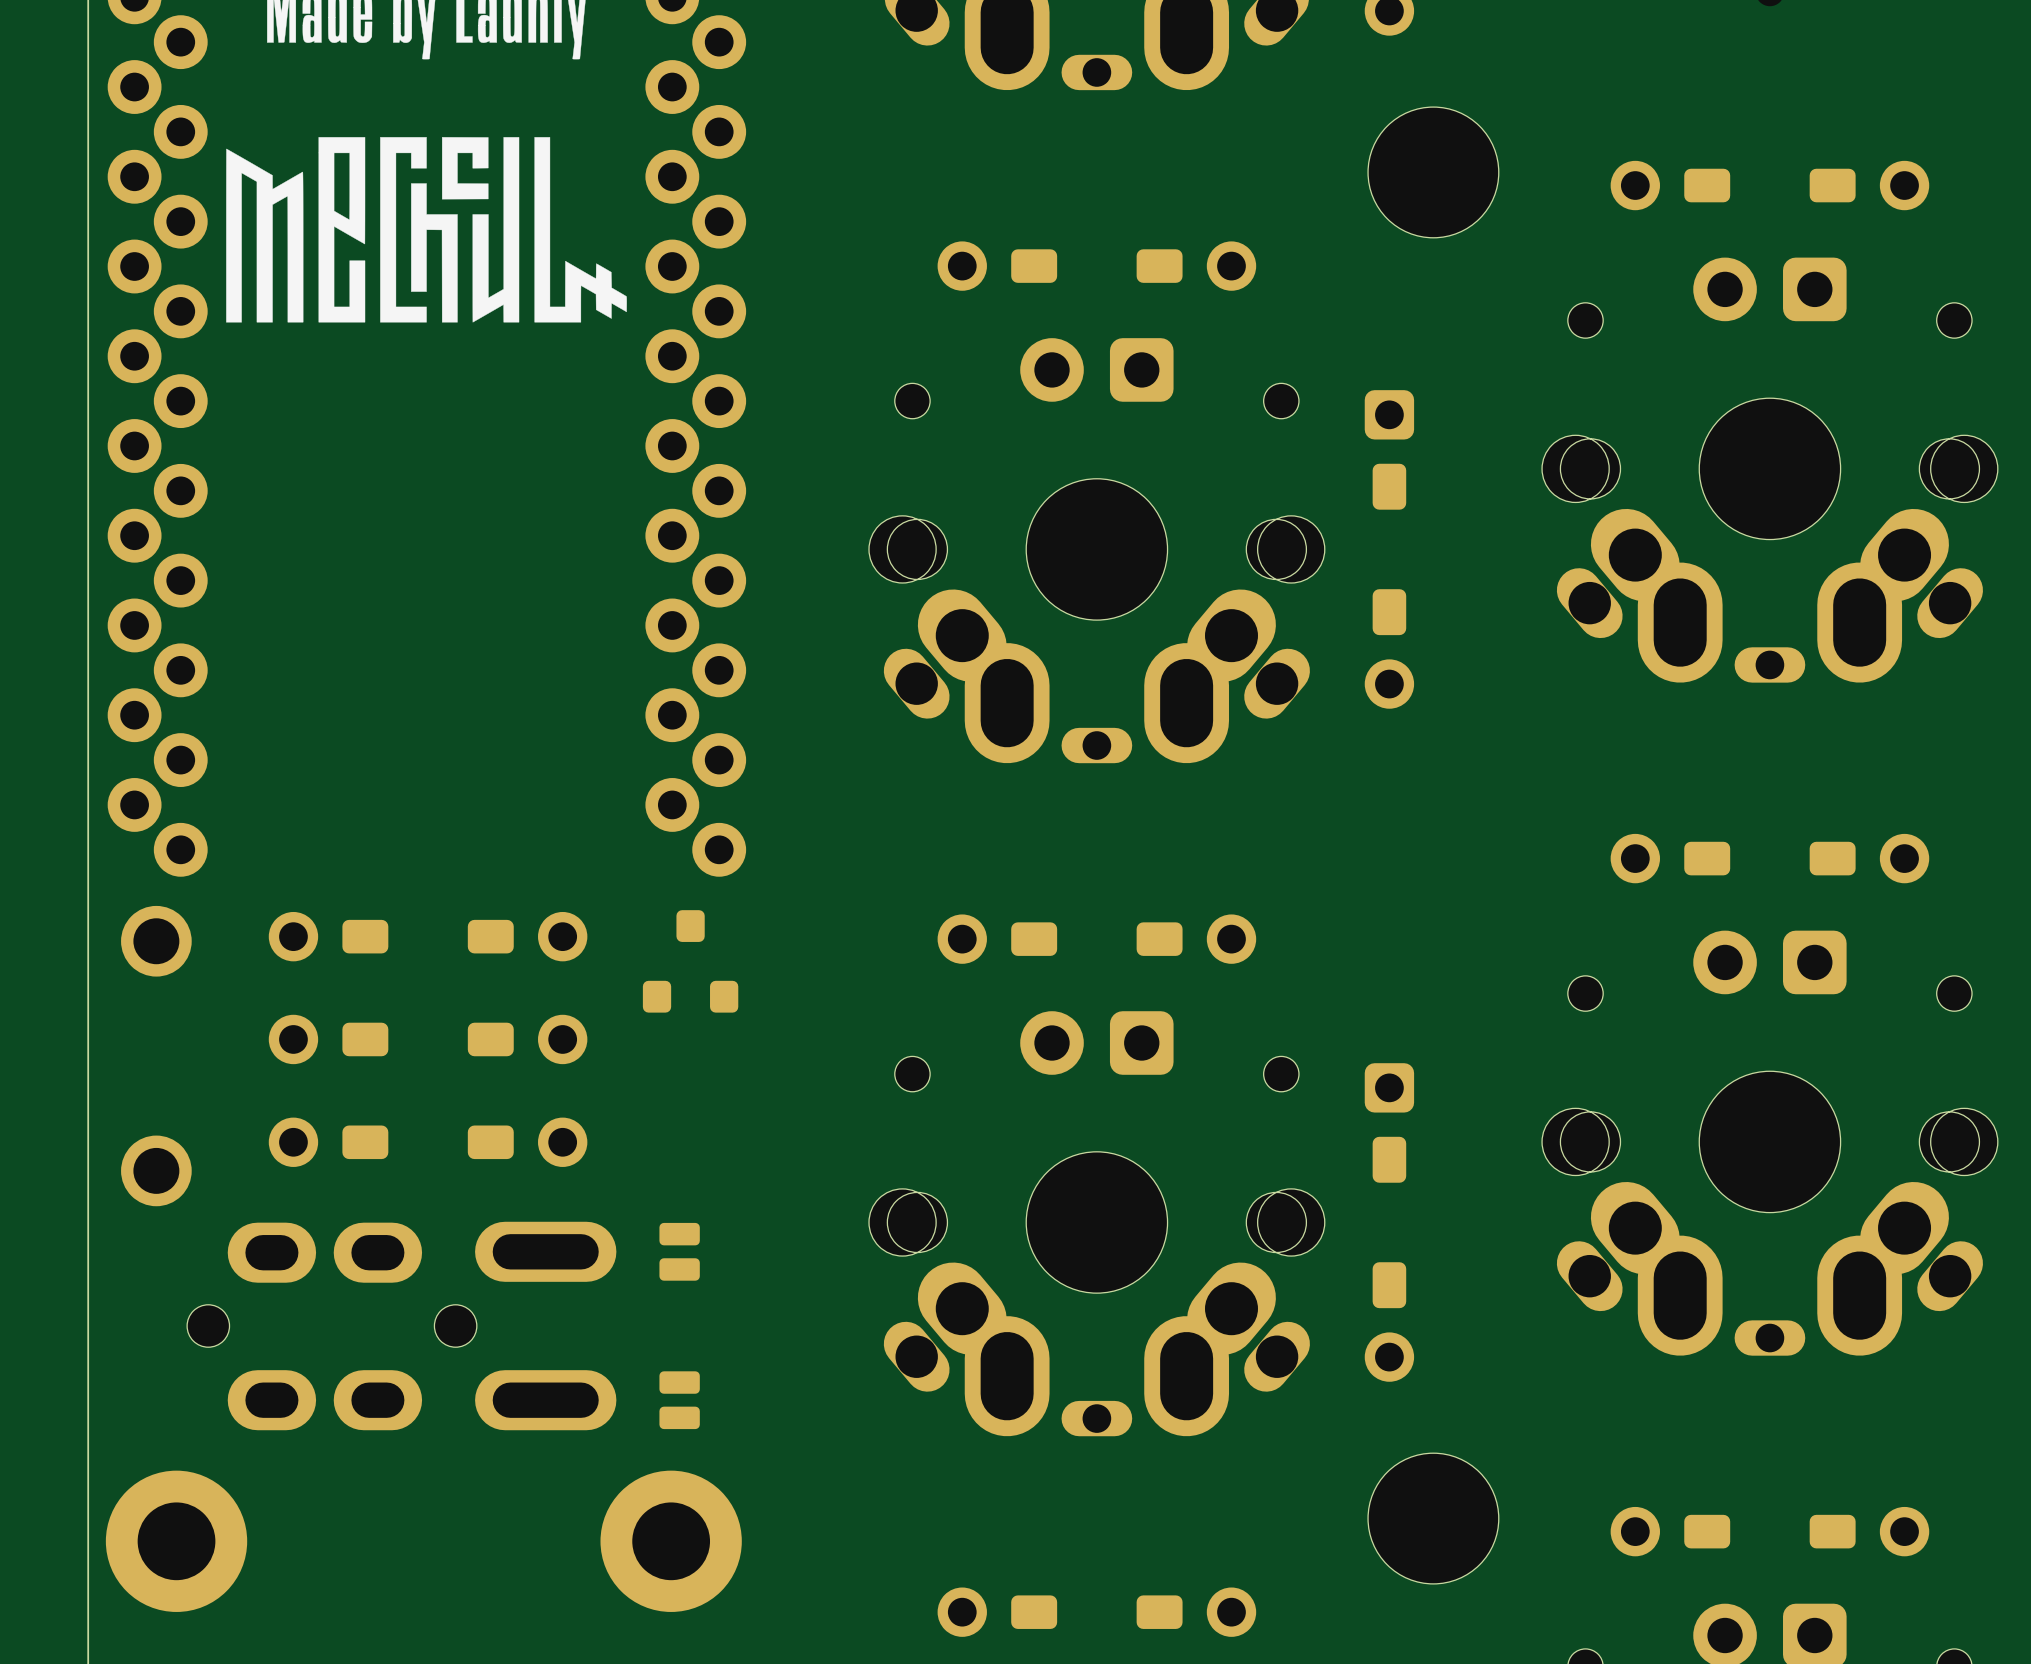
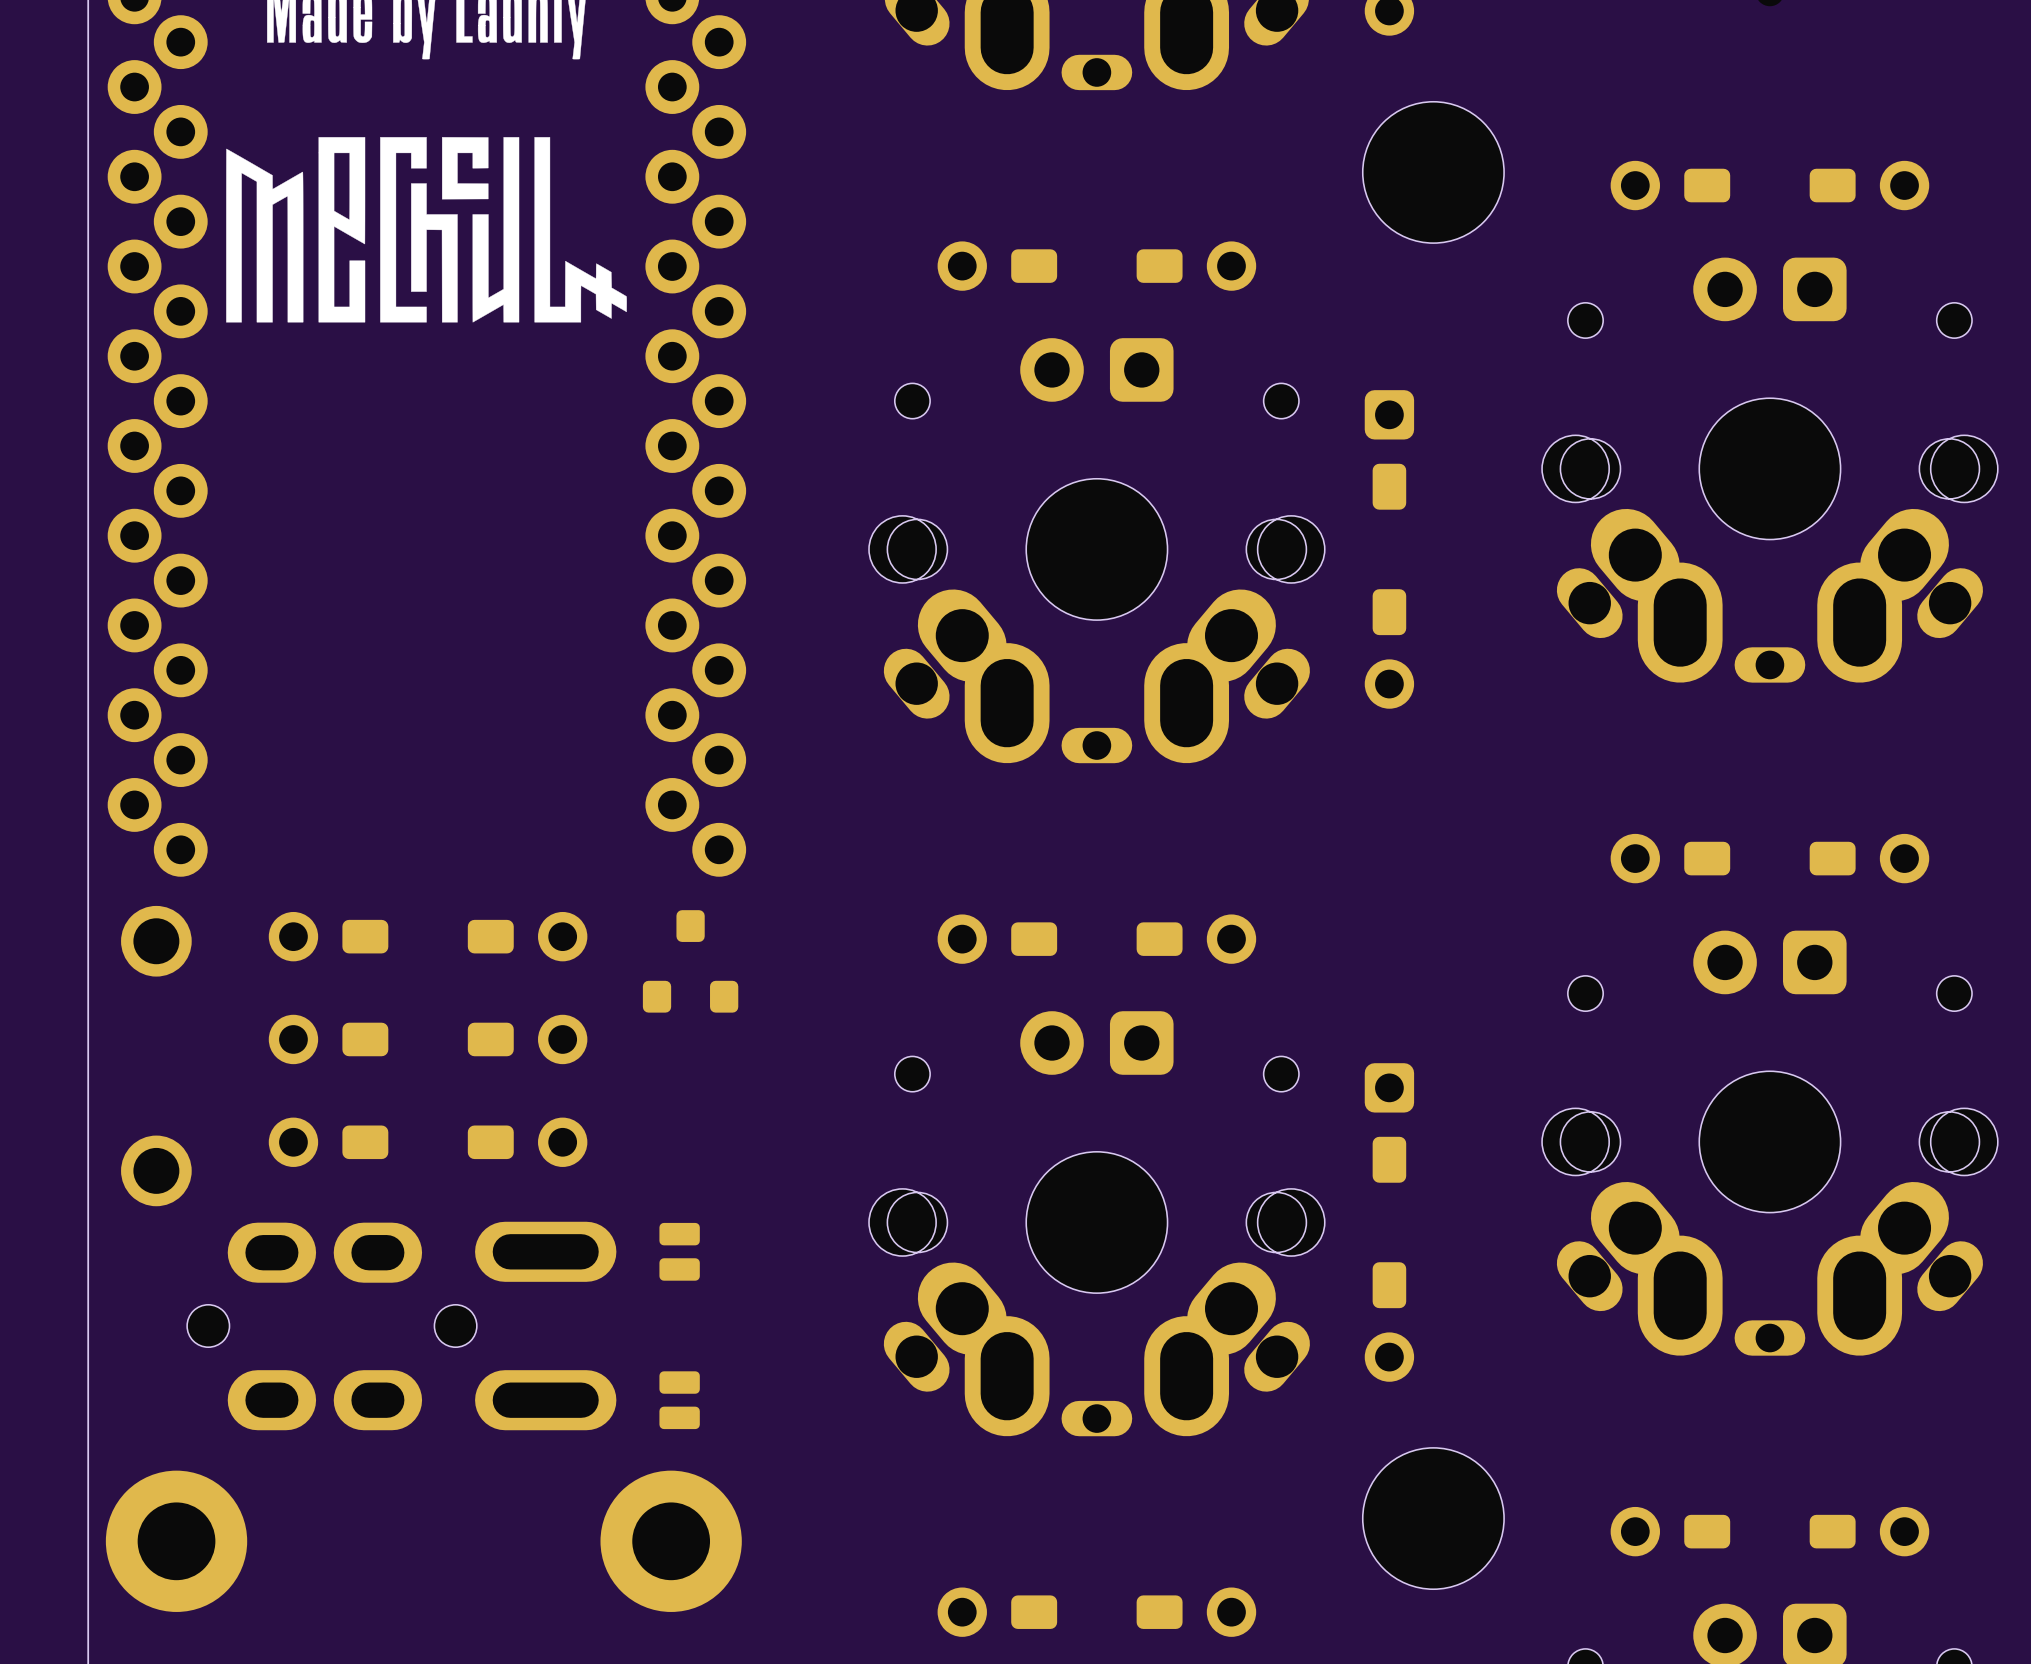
part footprint: [1368, 107, 1499, 238] -> [1362, 101, 1505, 244]
part footprint: [1368, 1453, 1499, 1584] -> [1362, 1447, 1505, 1590]

